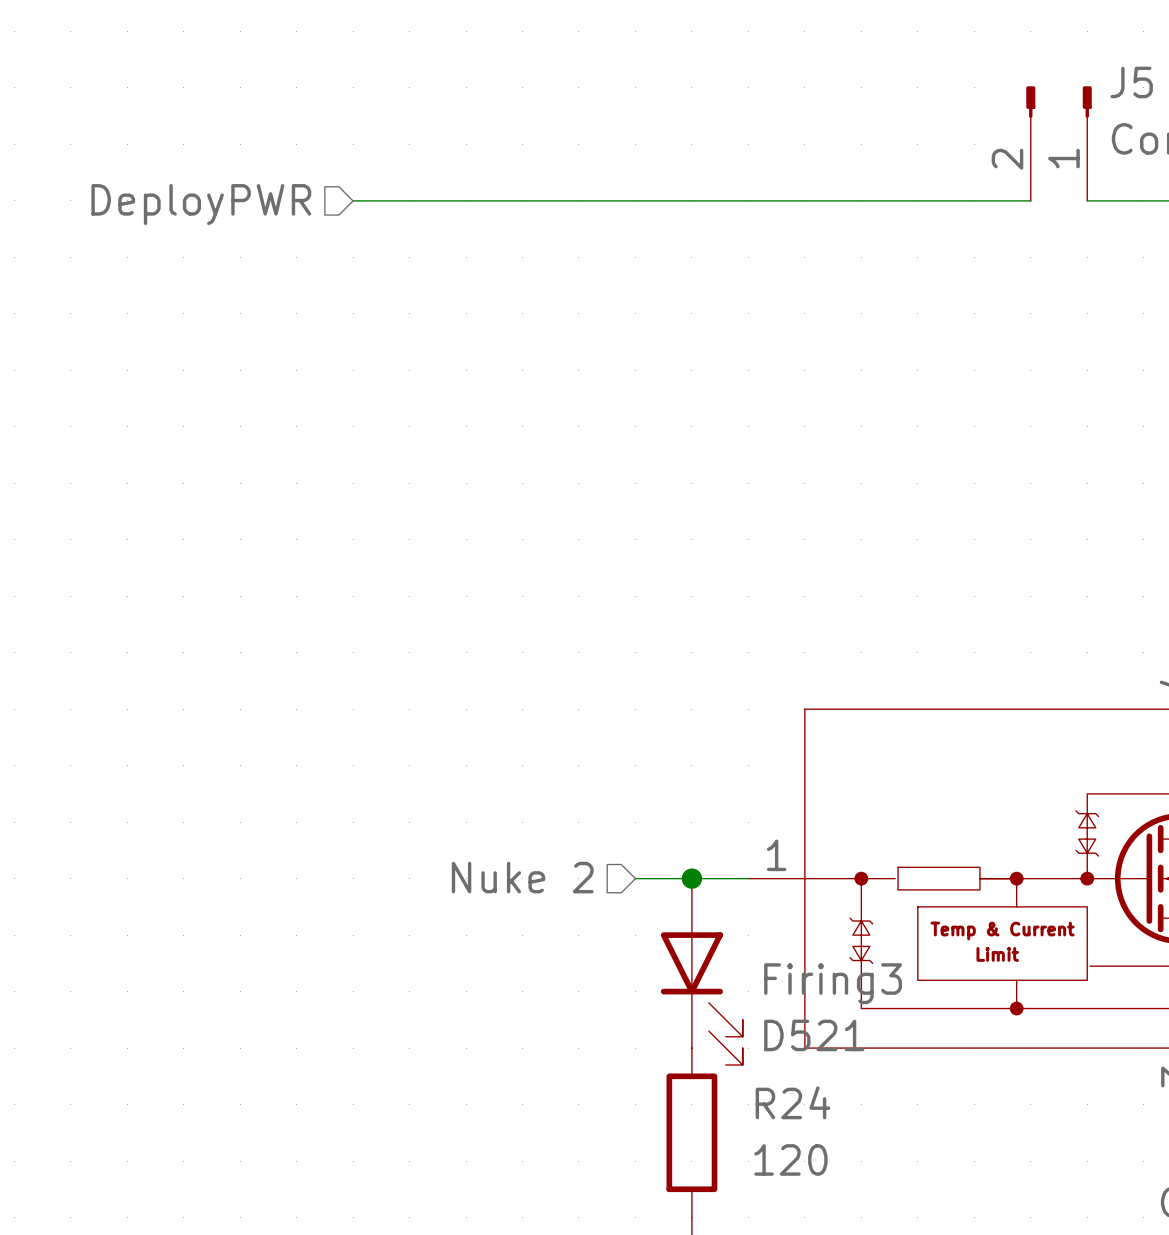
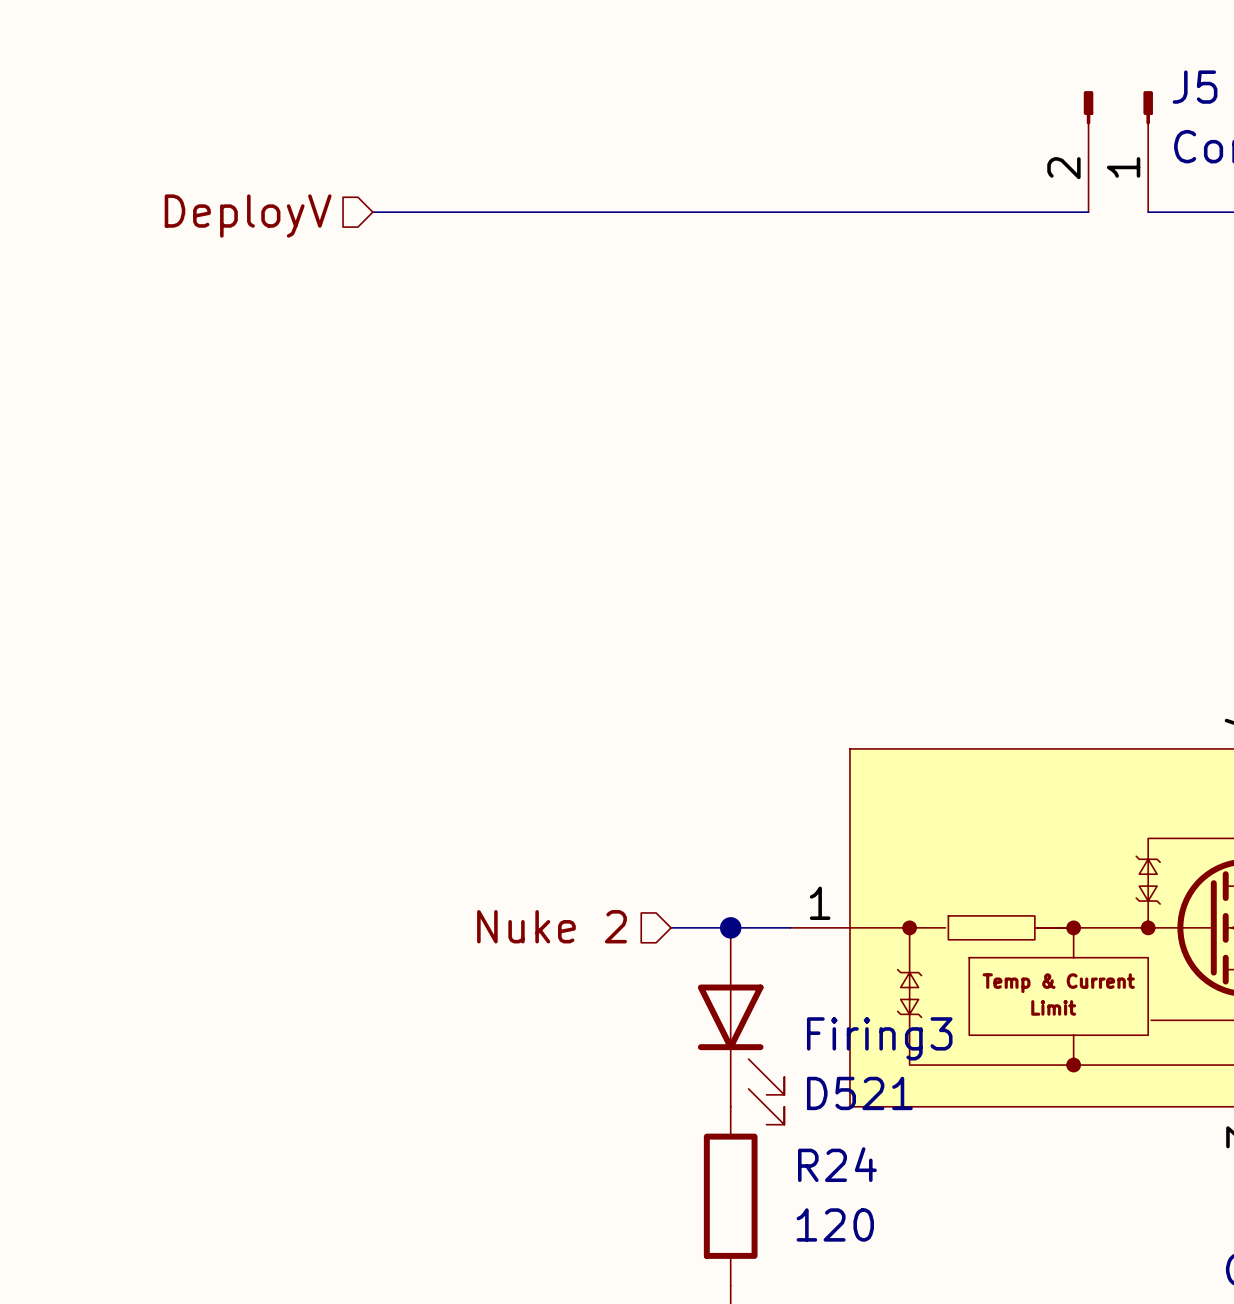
hierarchical label: DeployPWR (201, 204) -> DeployV (248, 216)

